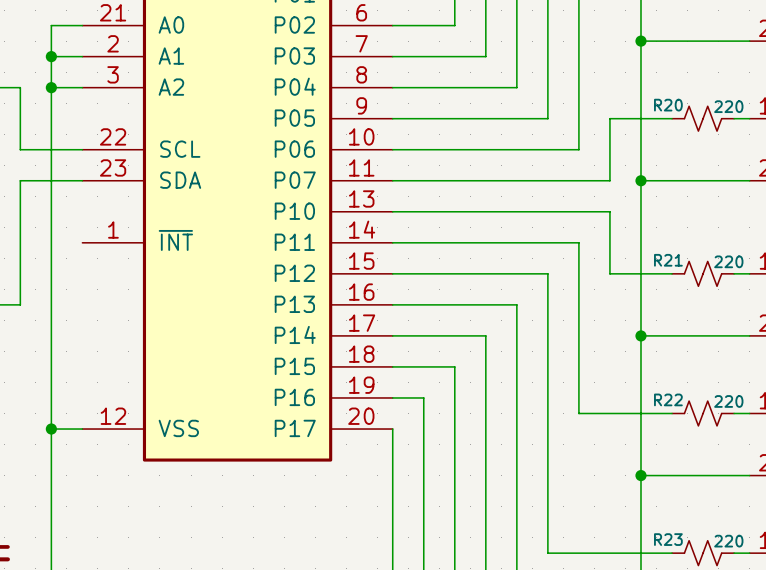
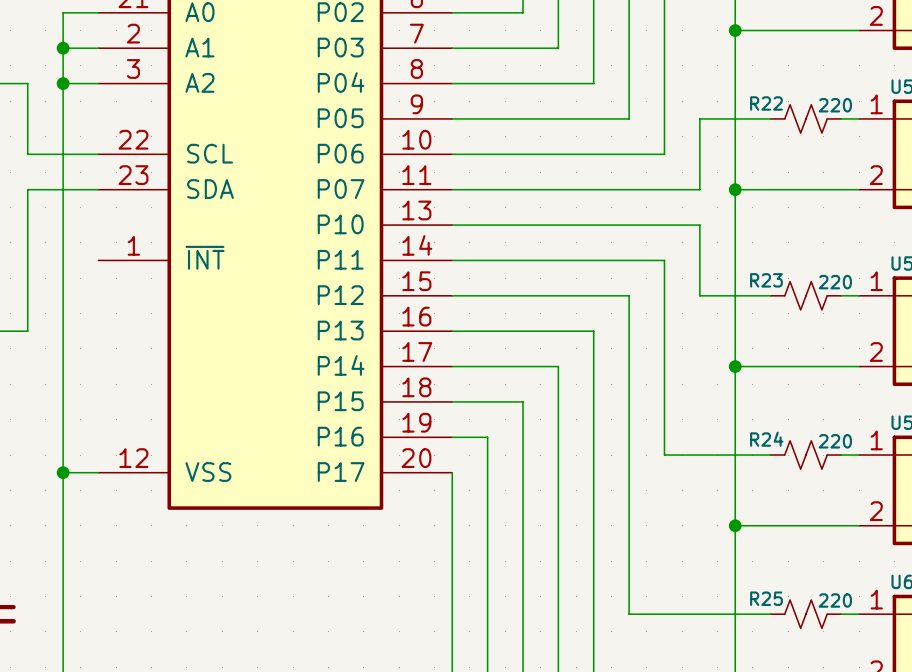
R20 name: R20 (668, 105) -> R22 (766, 103)
R21 name: R21 (668, 260) -> R23 (766, 280)
R22 name: R22 (668, 399) -> R24 (766, 439)
R23 name: R23 (668, 539) -> R25 (766, 598)

